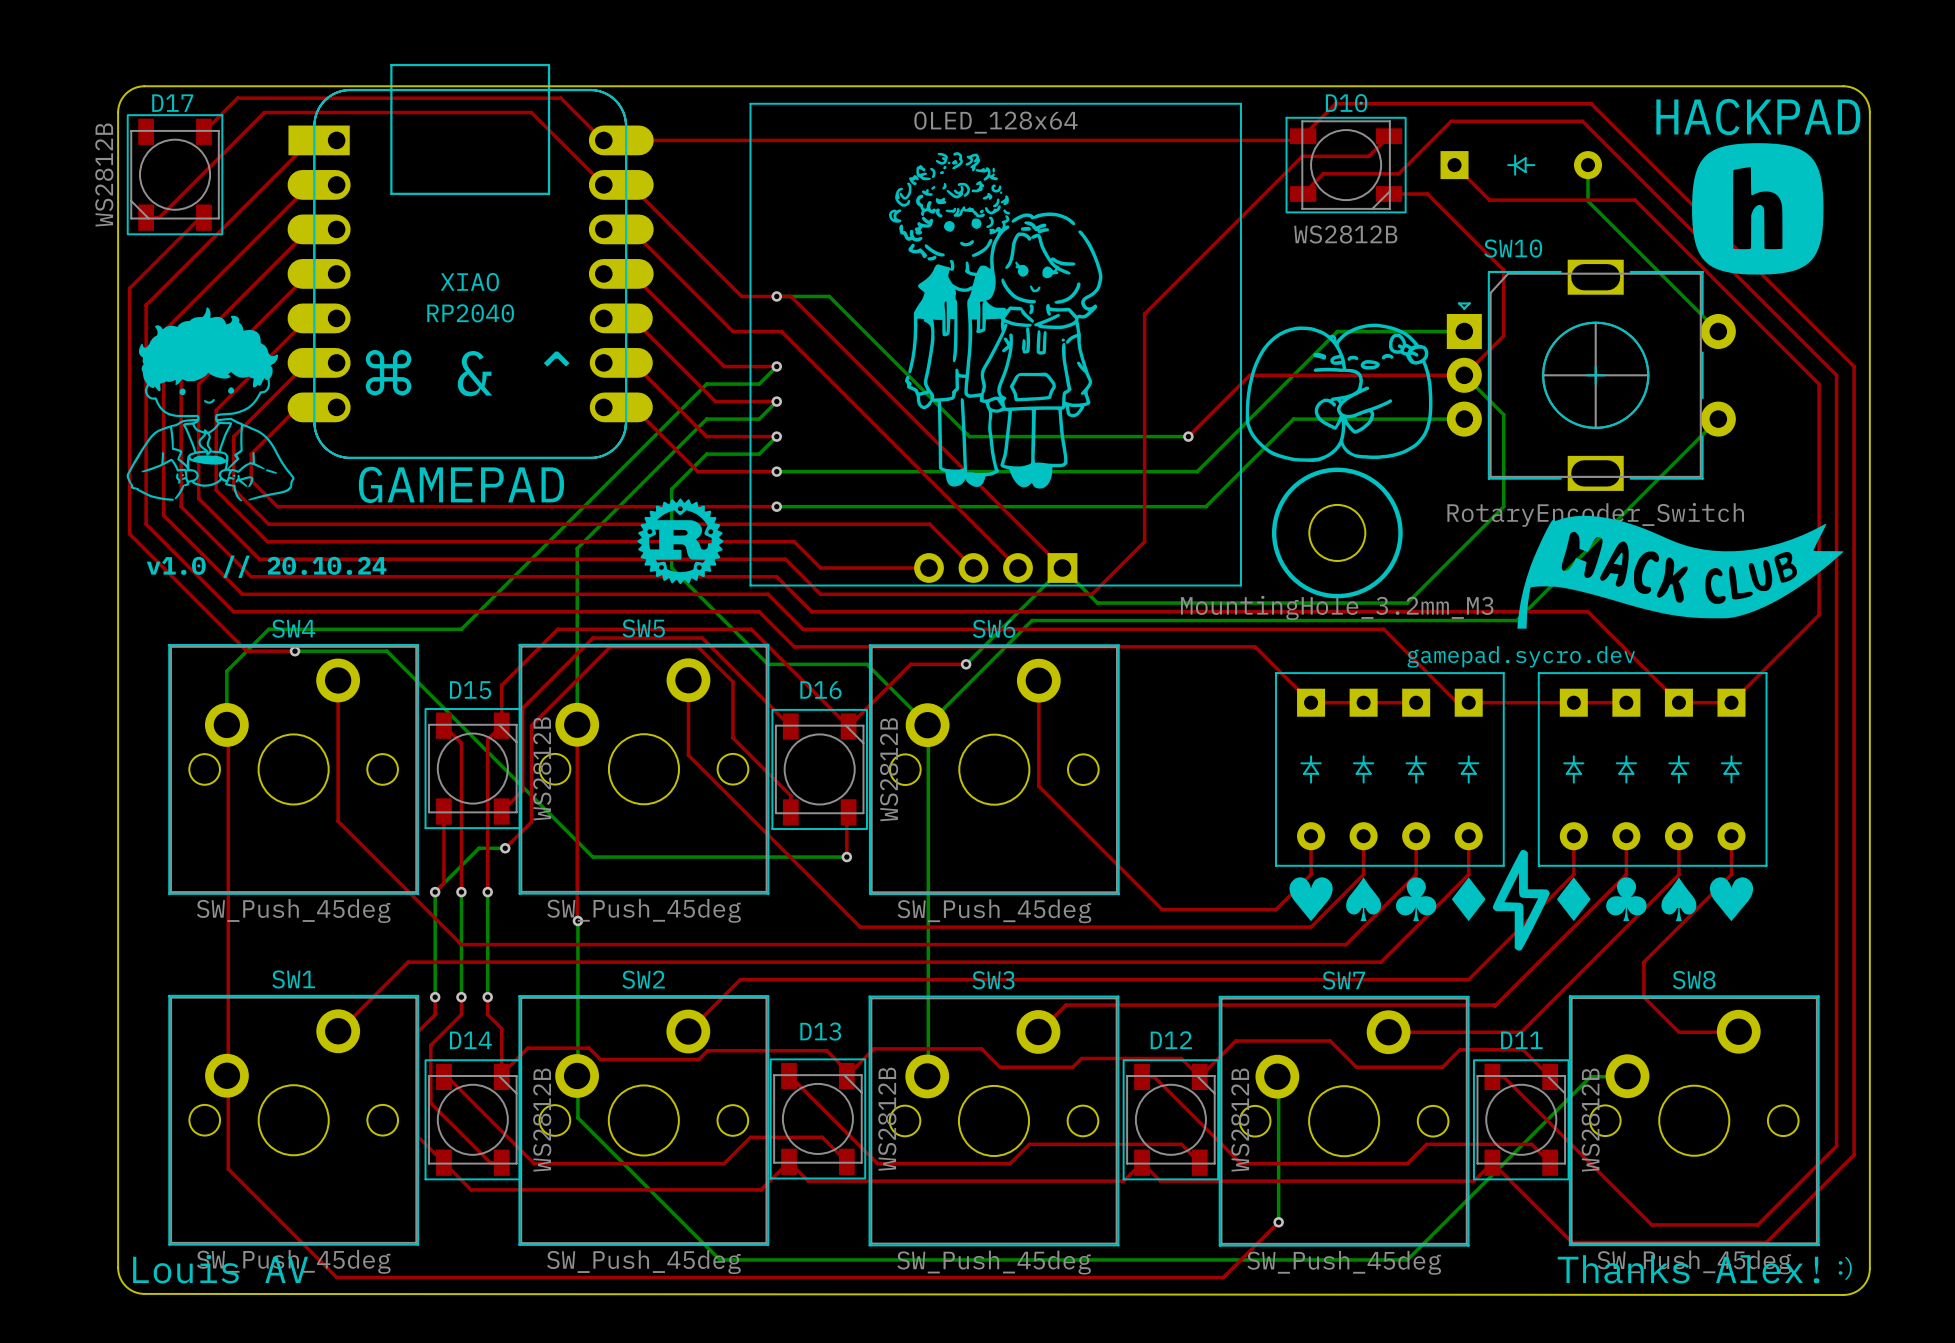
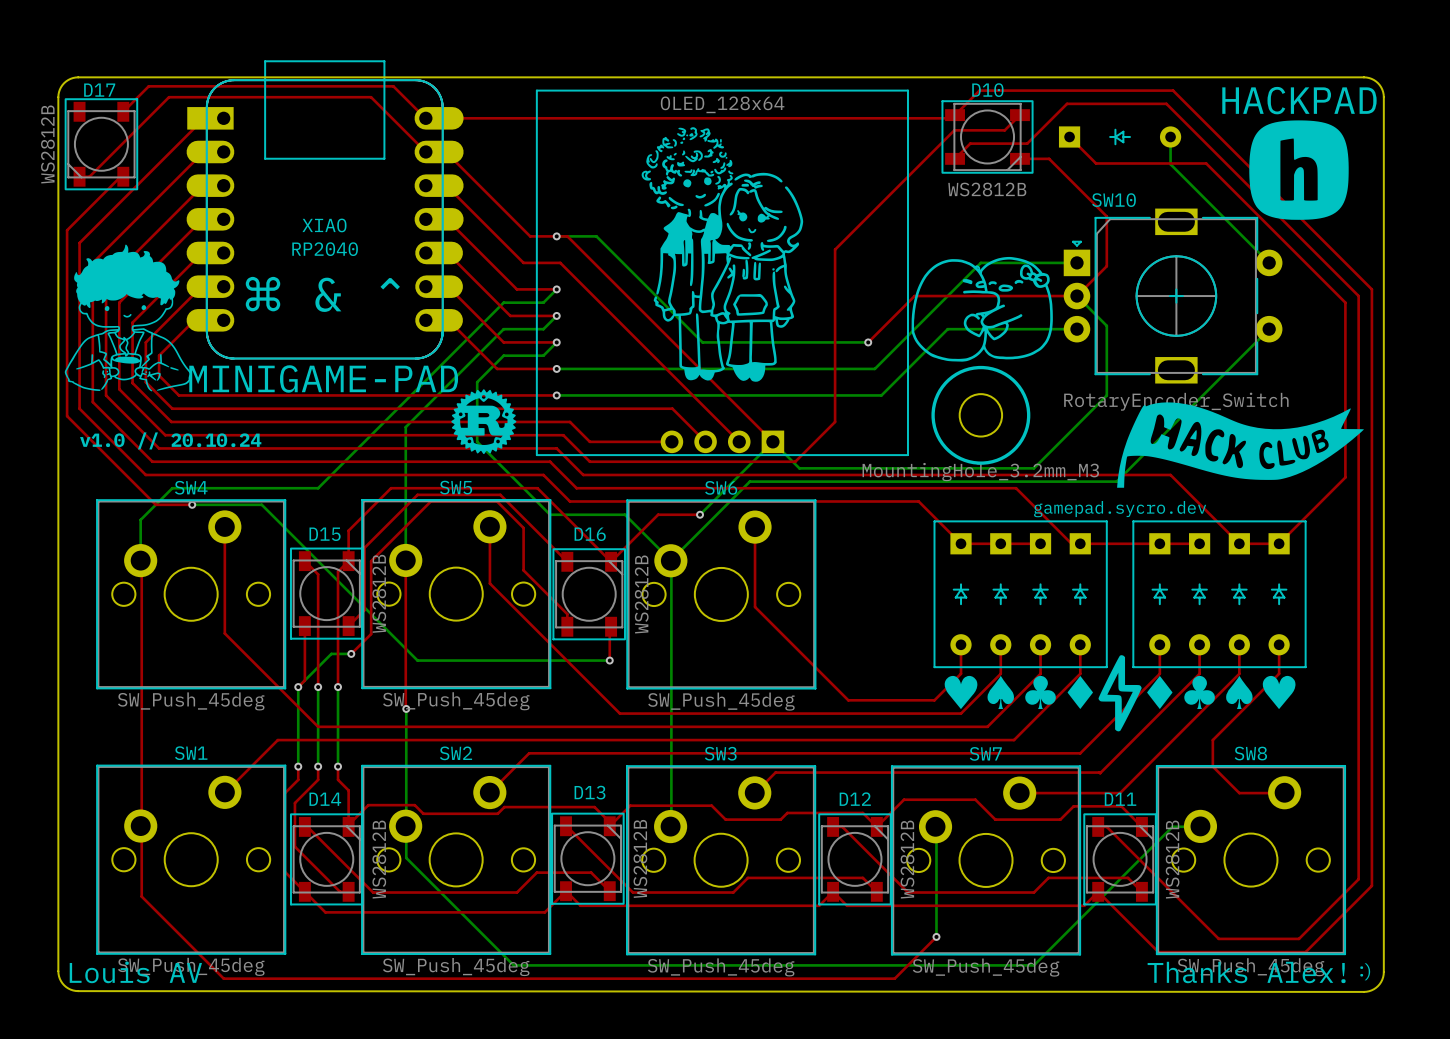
text: GAMEPAD (461, 484) -> MINIGAME-PAD (323, 378)

